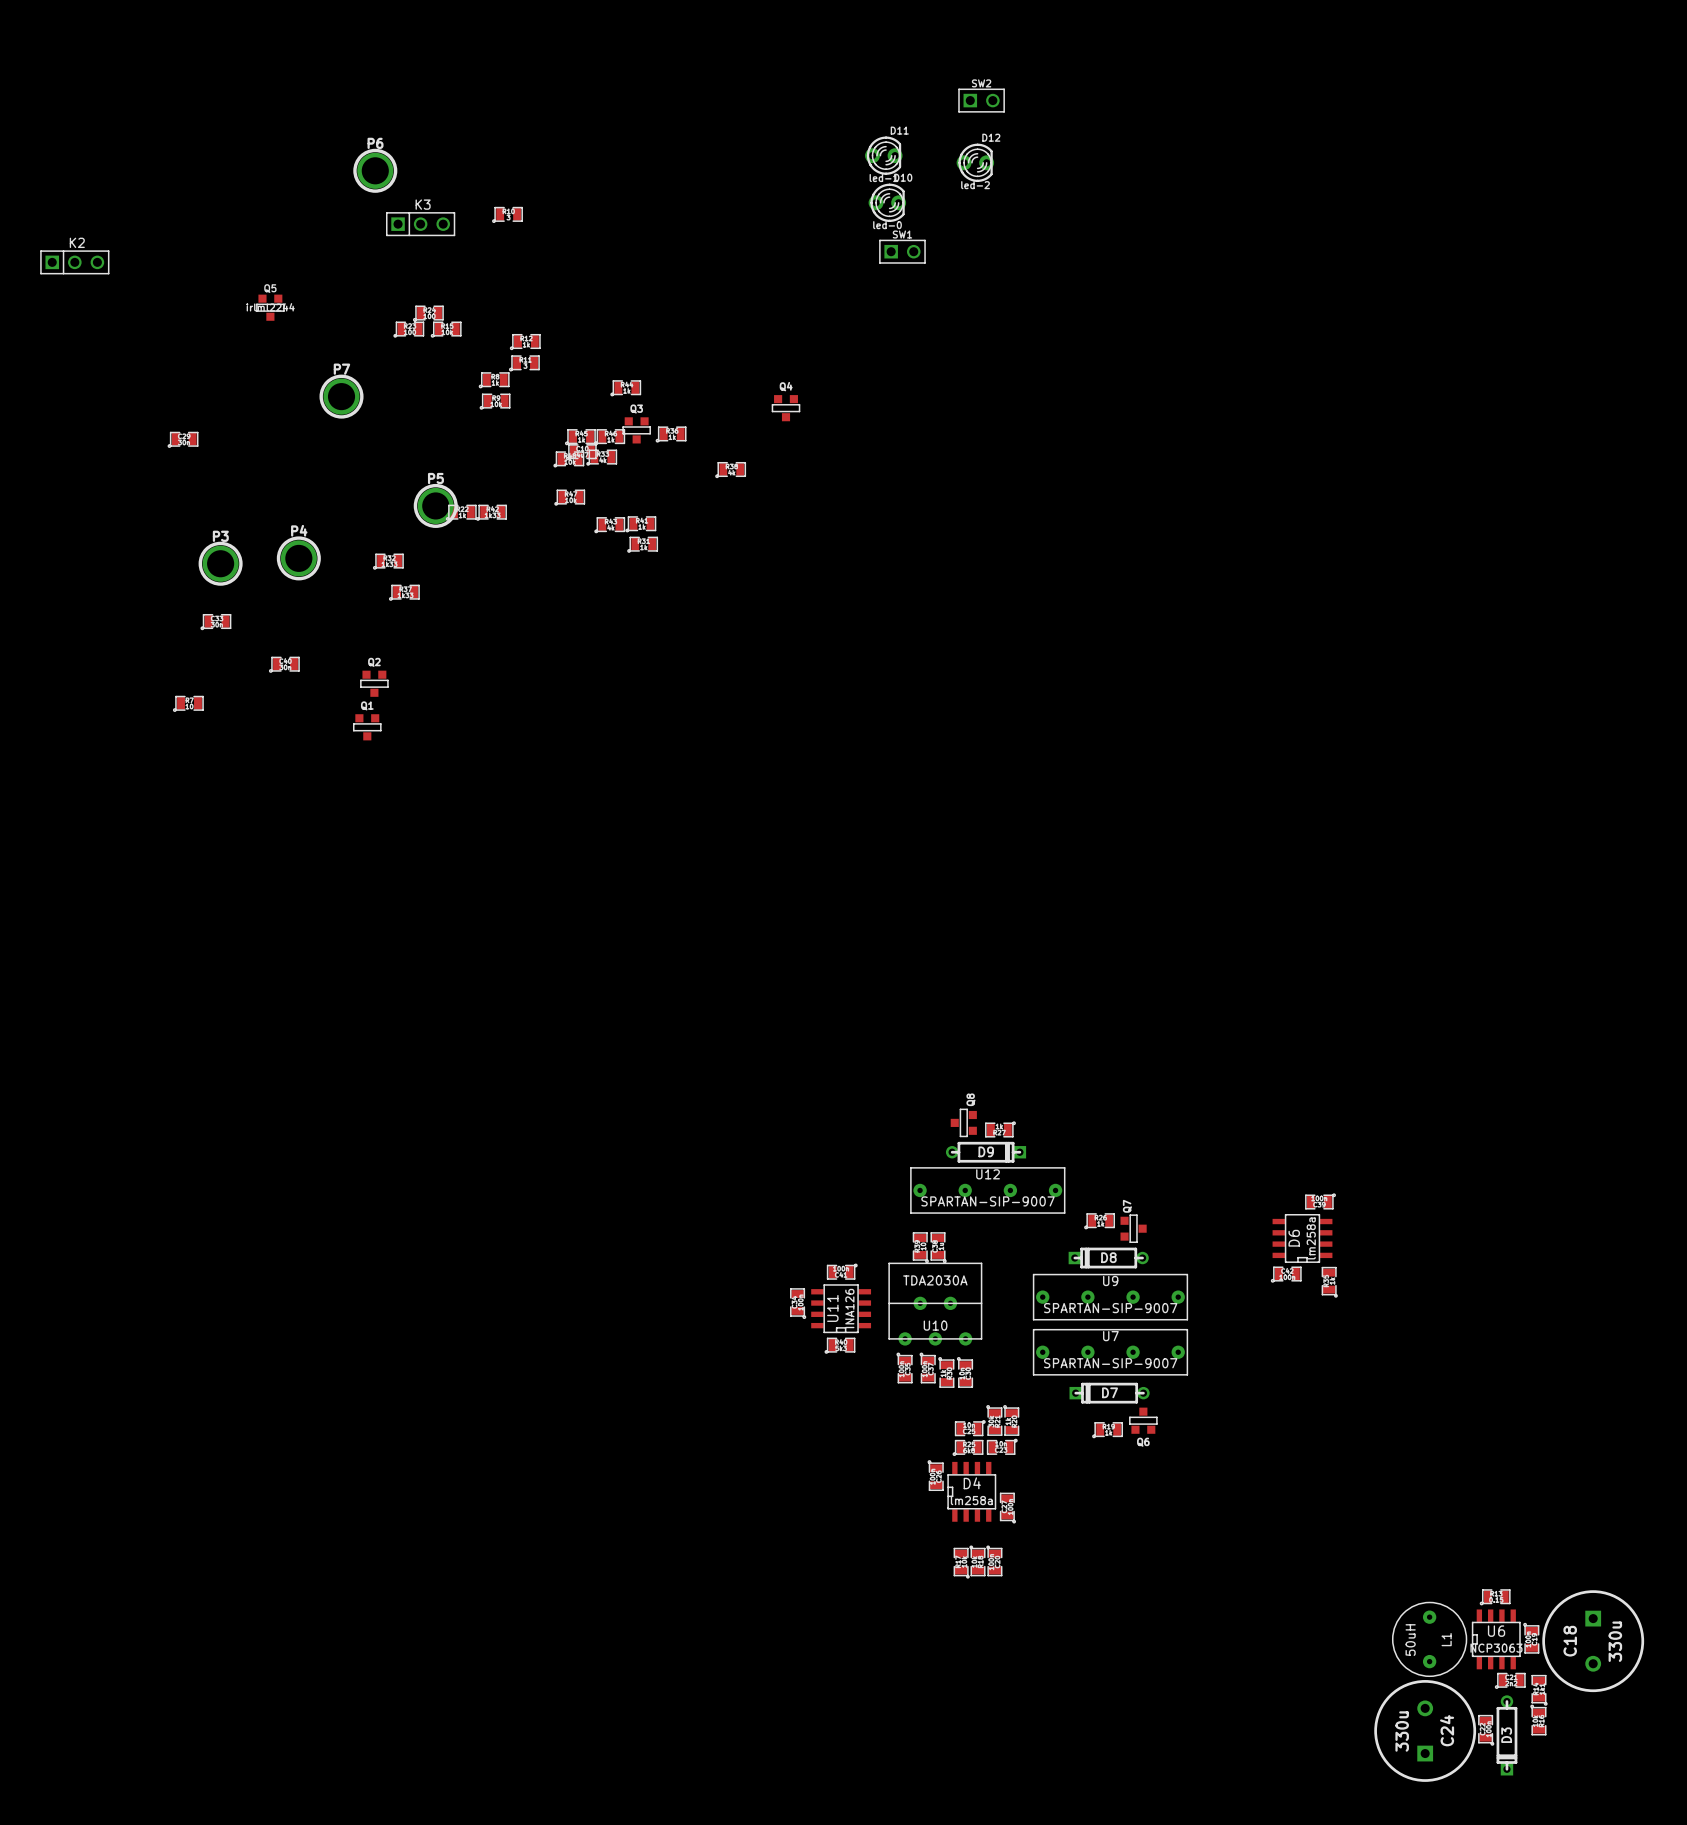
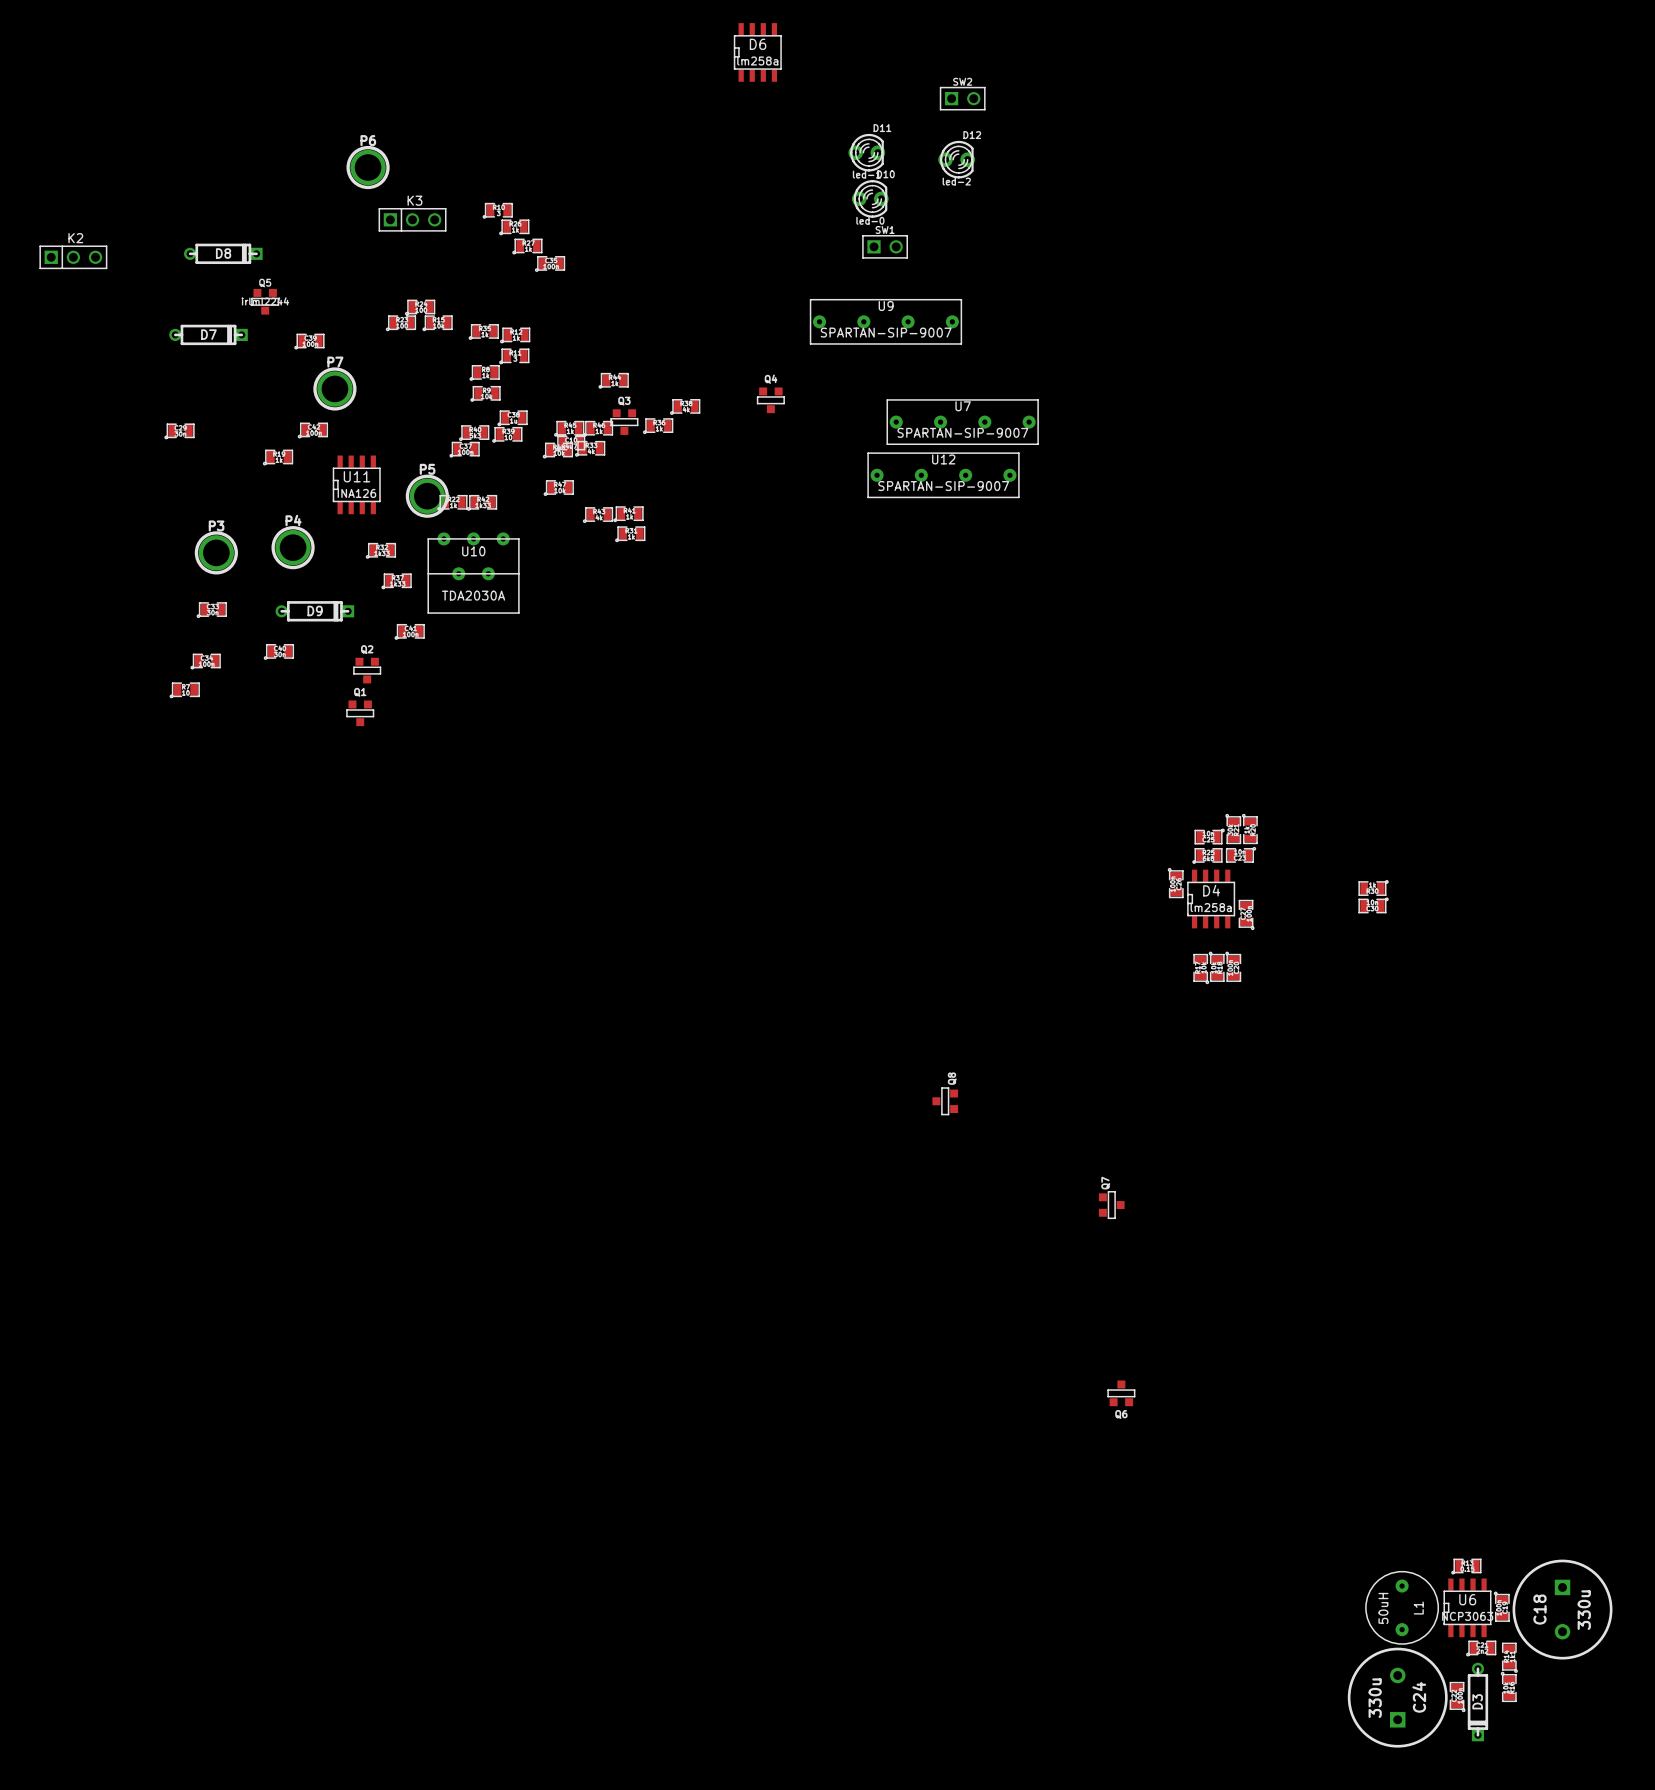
part position: (730, 470) -> (685, 406)
part rotation: 0° (1000, 1129) -> 180° (527, 246)
part position: (1000, 1129) -> (527, 246)
D9 position: (986, 1152) -> (314, 611)
U12 position: (987, 1190) -> (943, 475)
part rotation: 0° (1320, 1201) -> 180° (309, 341)
part position: (1320, 1201) -> (309, 341)
part position: (1099, 1221) -> (514, 227)
D6 rotation: 0° (1302, 1238) -> 90° clockwise (757, 52)
D6 position: (1302, 1238) -> (757, 52)
part rotation: 0° (920, 1247) -> 90° clockwise (507, 434)
part position: (920, 1247) -> (507, 434)
part rotation: 0° (938, 1247) -> 90° clockwise (512, 418)
part position: (938, 1247) -> (512, 418)
D8 rotation: 0° (1108, 1258) -> 180° (223, 253)
D8 position: (1108, 1258) -> (223, 253)
part rotation: 0° (842, 1271) -> 180° (409, 631)
part position: (842, 1271) -> (409, 631)
part position: (1286, 1274) -> (312, 430)
part rotation: 0° (1329, 1282) -> 90° clockwise (483, 331)
part position: (1329, 1282) -> (483, 331)
U9 position: (1110, 1297) -> (885, 321)
part rotation: 0° (798, 1303) -> 90° clockwise (205, 661)
part position: (798, 1303) -> (205, 661)
U10 rotation: 0° (935, 1304) -> 180° (473, 573)
U10 position: (935, 1304) -> (473, 573)
U11 rotation: 0° (841, 1308) -> 90° clockwise (356, 484)
U11 position: (841, 1308) -> (356, 484)
part position: (839, 1345) -> (474, 433)
U7 position: (1110, 1352) -> (962, 422)
part rotation: 0° (904, 1368) -> 90° counterclockwise (550, 263)
part position: (904, 1368) -> (550, 263)
part rotation: 0° (927, 1368) -> 90° counterclockwise (464, 449)
part position: (927, 1368) -> (464, 449)
part rotation: 0° (946, 1372) -> 90° clockwise (1373, 887)
part position: (946, 1372) -> (1373, 887)
part rotation: 0° (965, 1372) -> 90° clockwise (1373, 905)
part position: (965, 1372) -> (1373, 905)
D7 rotation: 0° (1109, 1393) -> 180° (208, 334)
D7 position: (1109, 1393) -> (208, 334)
part position: (994, 1420) -> (1233, 829)
part position: (1011, 1420) -> (1249, 829)
part position: (970, 1428) -> (1209, 836)
part position: (1107, 1430) -> (278, 457)
part position: (1002, 1446) -> (1241, 854)
part position: (968, 1447) -> (1207, 855)
part position: (935, 1475) -> (1175, 883)
D4 position: (971, 1491) -> (1211, 899)
part position: (1007, 1508) -> (1246, 914)
part position: (977, 1560) -> (1216, 966)
part position: (994, 1560) -> (1233, 966)
part position: (961, 1563) -> (1201, 968)

